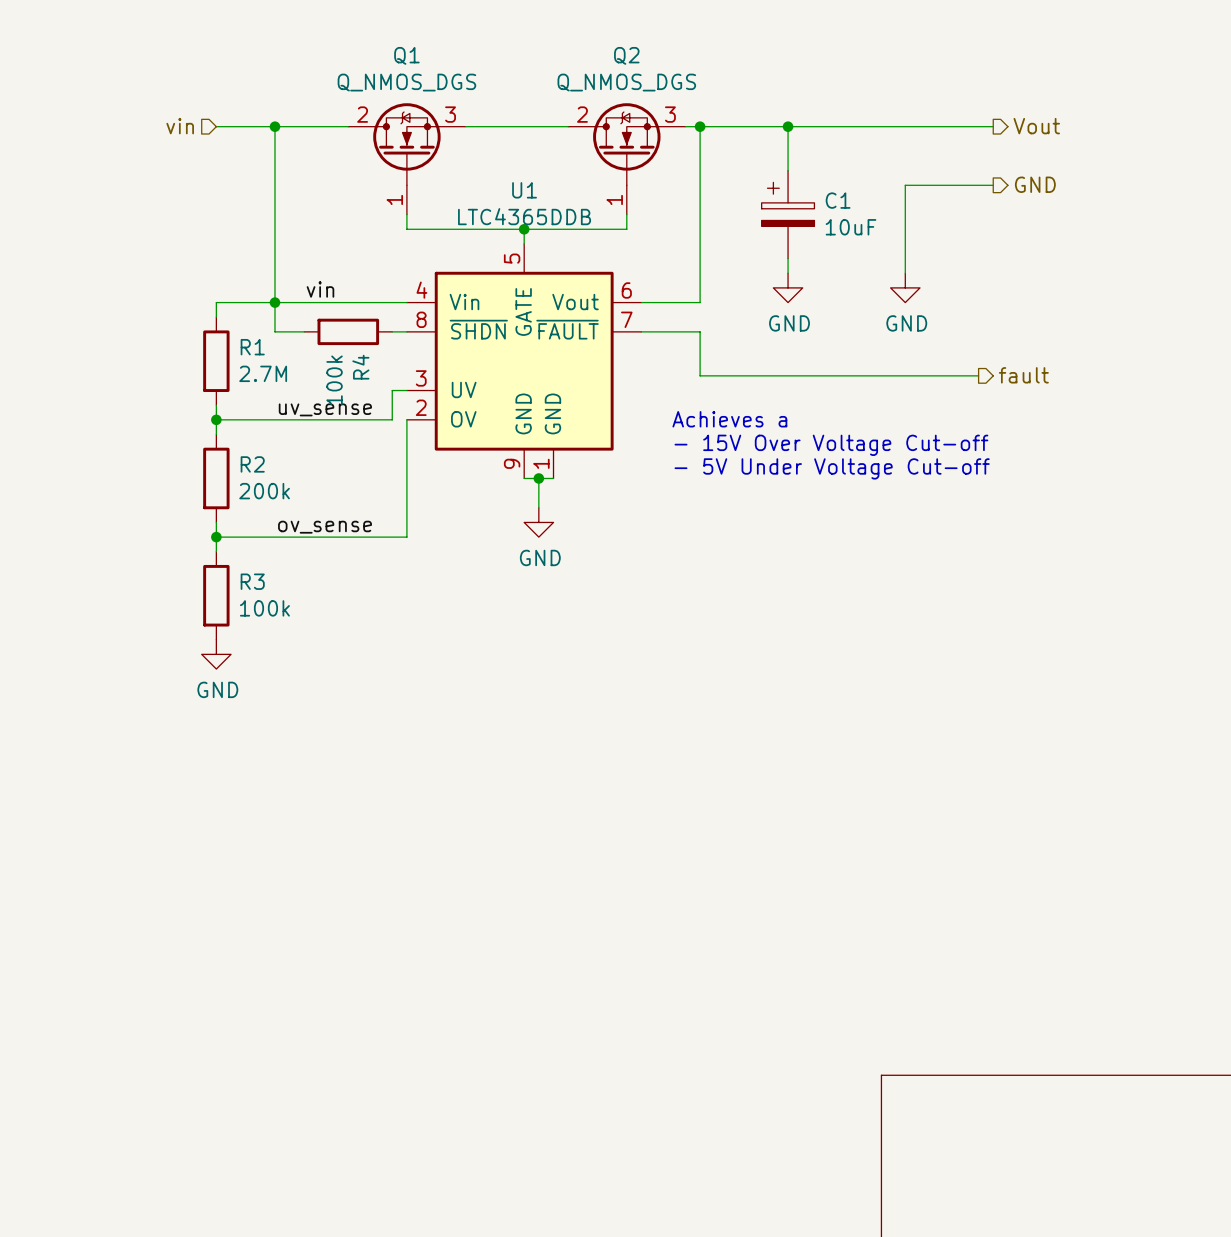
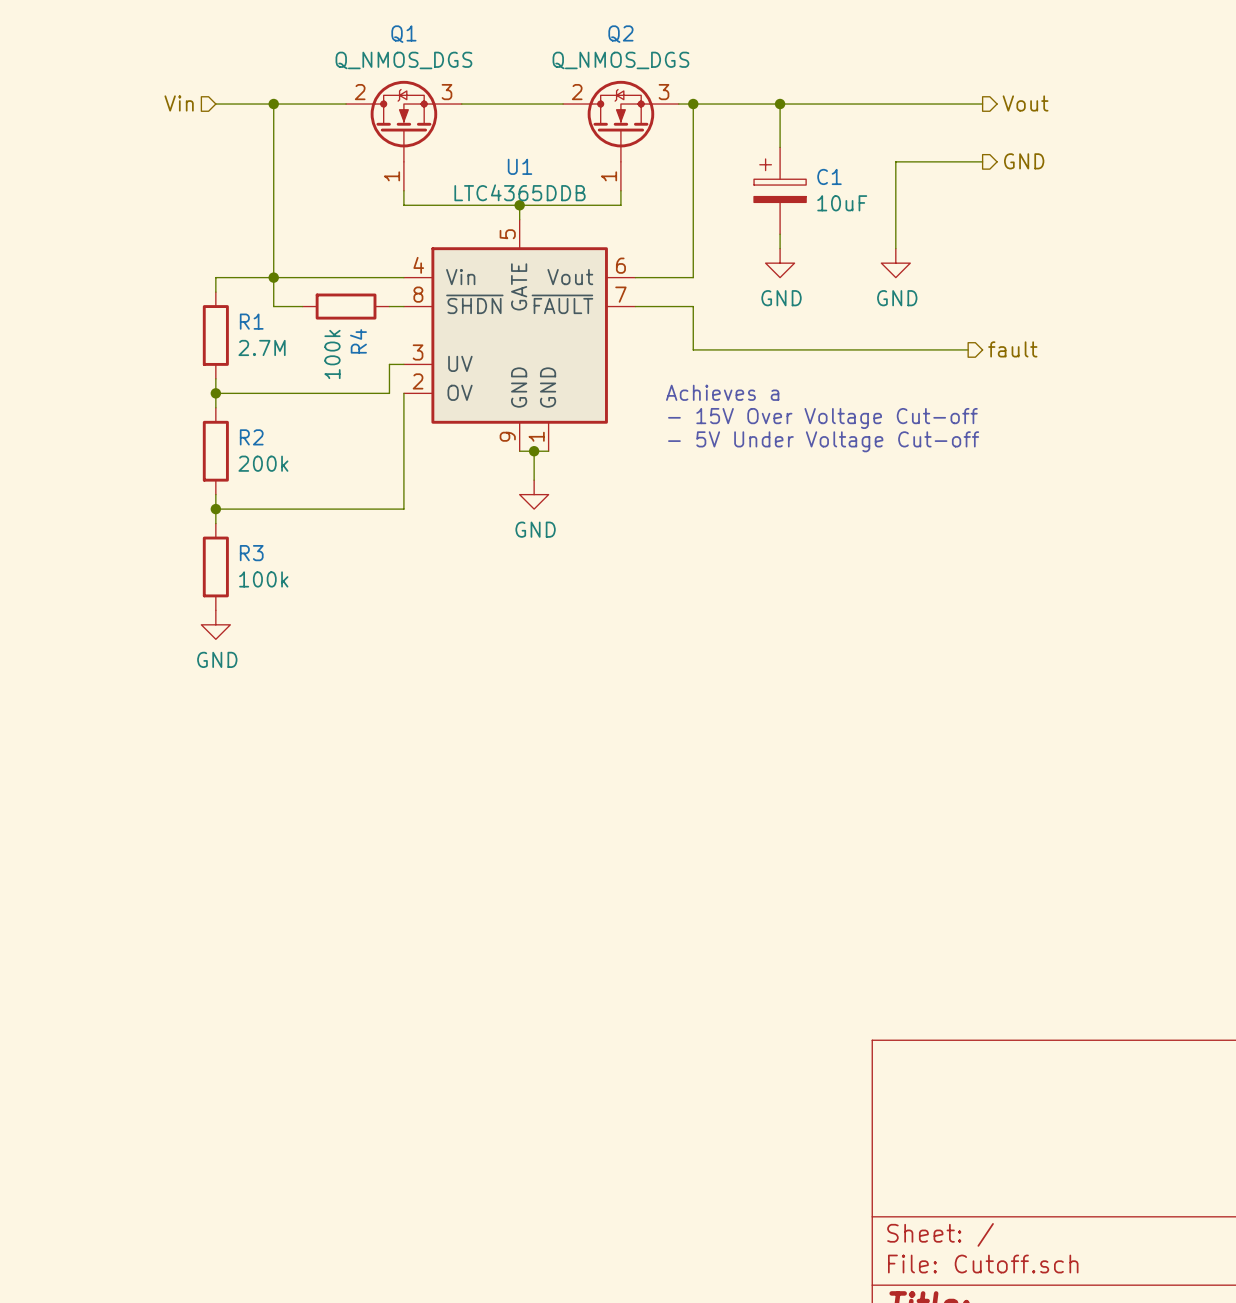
hierarchical label: vin (180, 126) -> Vin (179, 103)
label: vin (320, 289) -> none
label: uv_sense (325, 409) -> none
label: ov_sense (325, 527) -> none

